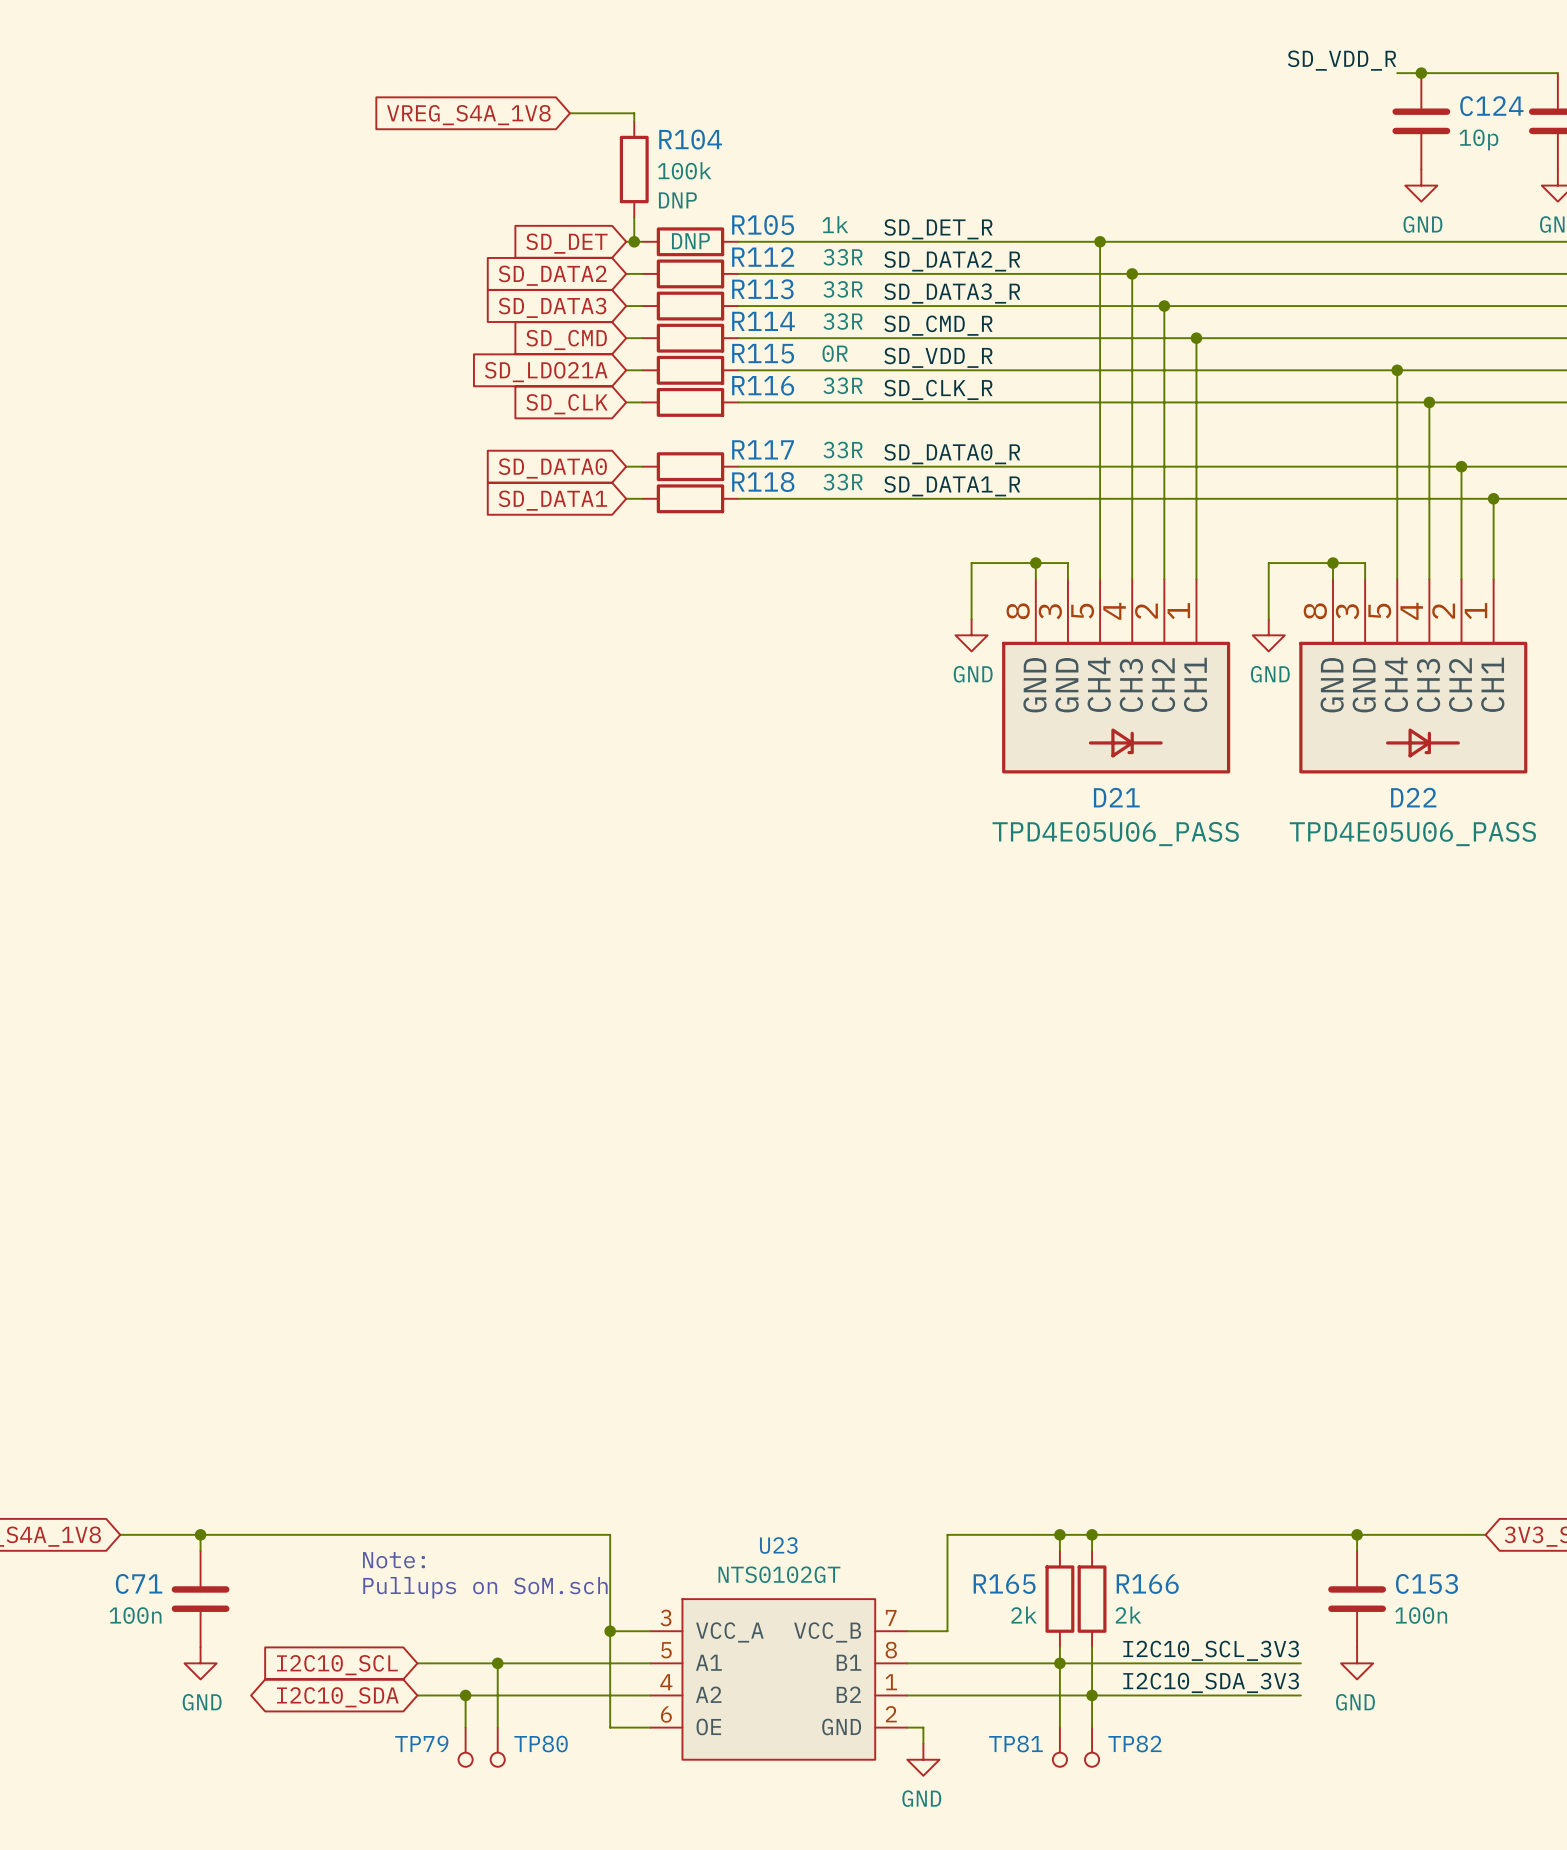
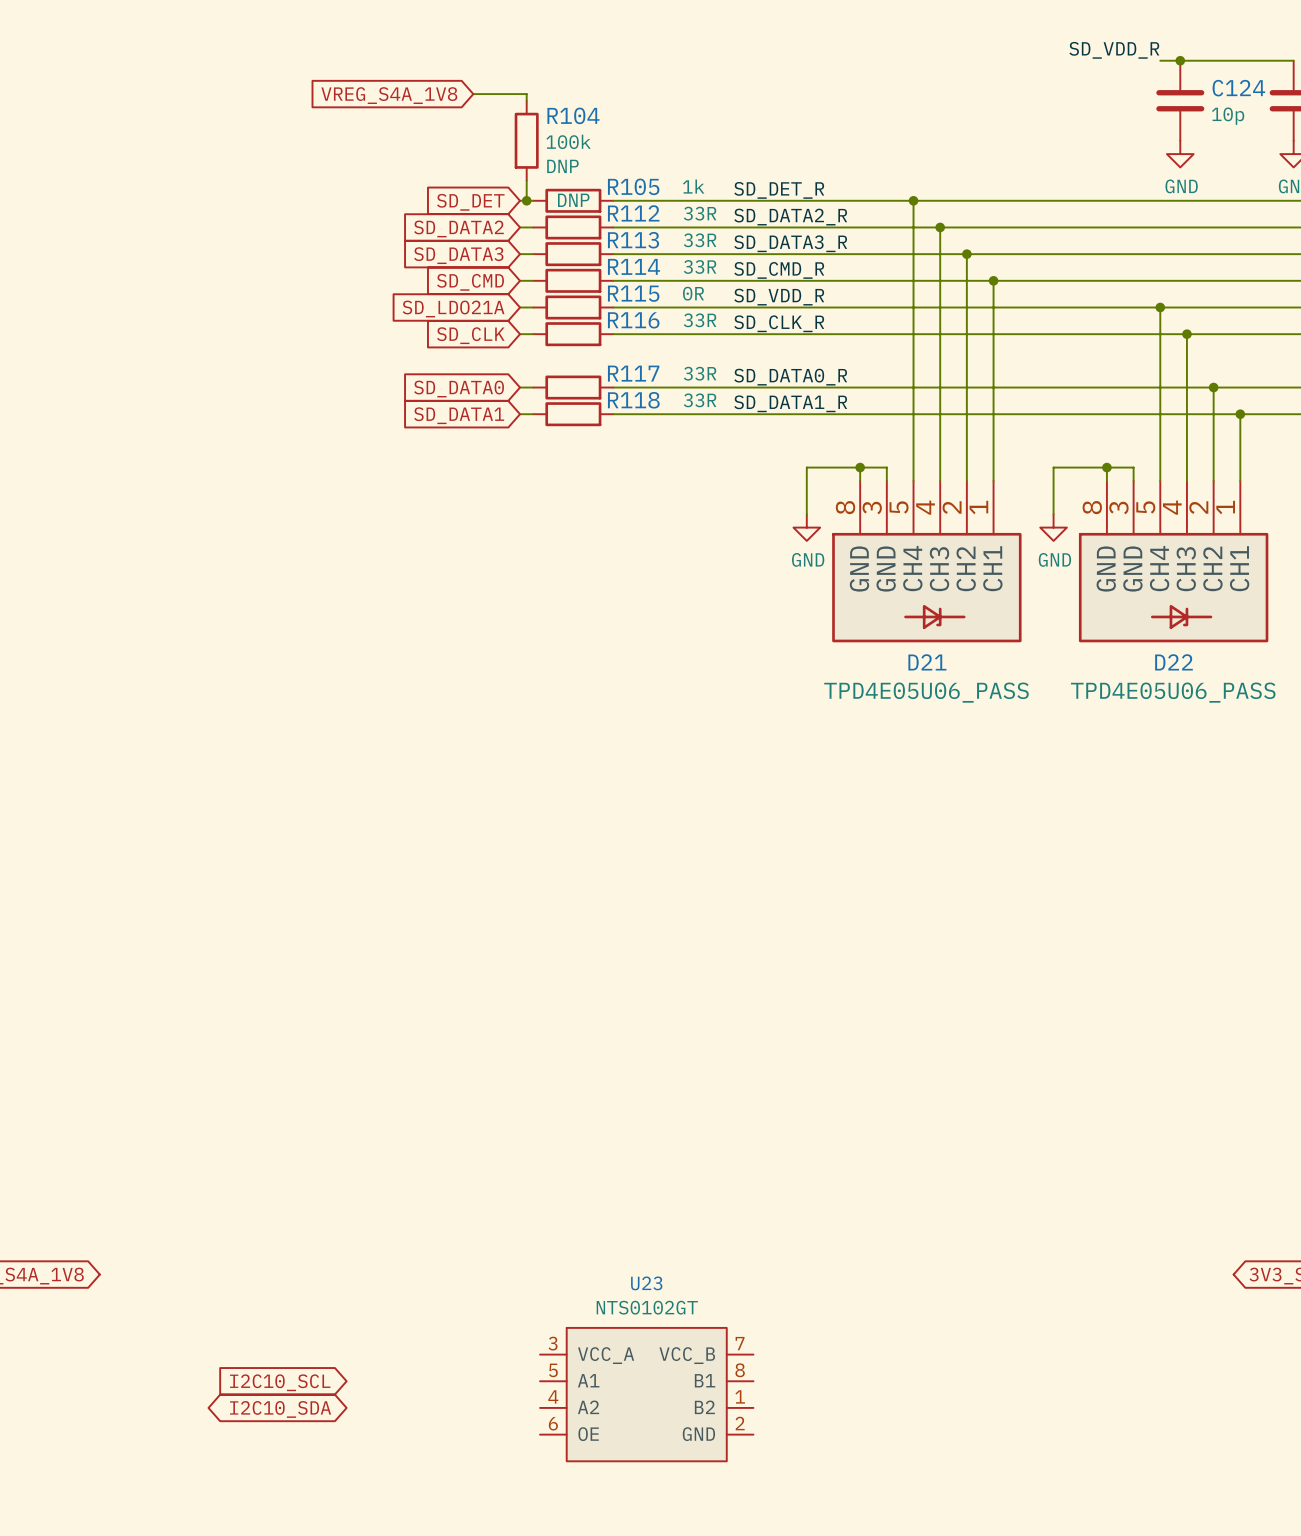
wire: (120, 1534) (610, 1534) (610, 1727) (650, 1727) -> none
wire: (200, 1534) (200, 1550) -> none
junction: (200, 1534) -> none
wire: (1059, 1534) (1059, 1550) -> none
junction: (1059, 1534) -> none
wire: (1092, 1534) (1092, 1550) -> none
junction: (1092, 1534) -> none
wire: (1357, 1534) (1357, 1550) -> none
junction: (1357, 1534) -> none
wire: (1485, 1534) (947, 1534) (947, 1631) (907, 1631) -> none
text: Note: (394, 1560) -> none
text: Pullups on SoM.sch (485, 1587) -> none
C71: (200, 1599) -> none
R165: (1059, 1599) -> none
R166: (1092, 1599) -> none
C153: (1357, 1599) -> none
wire: (610, 1631) (650, 1631) -> none
junction: (610, 1631) -> none
wire: (1059, 1647) (1059, 1727) -> none
wire: (1092, 1647) (1092, 1727) -> none
label: I2C10_SCL_3V3 (1211, 1650) -> none
power symbol: GND (200, 1663) -> none
wire: (417, 1663) (650, 1663) -> none
wire: (497, 1663) (497, 1727) -> none
junction: (497, 1663) -> none
wire: (907, 1663) (1300, 1663) -> none
junction: (1059, 1663) -> none
power symbol: GND (1357, 1663) -> none
label: I2C10_SDA_3V3 (1211, 1682) -> none
wire: (417, 1695) (650, 1695) -> none
wire: (465, 1695) (465, 1727) -> none
junction: (465, 1695) -> none
wire: (907, 1695) (1300, 1695) -> none
junction: (1092, 1695) -> none
wire: (907, 1727) (923, 1727) (923, 1743) -> none
TP79: (465, 1747) -> none
TP80: (497, 1747) -> none
TP81: (1059, 1747) -> none
TP82: (1092, 1747) -> none
power symbol: GND (923, 1759) -> none

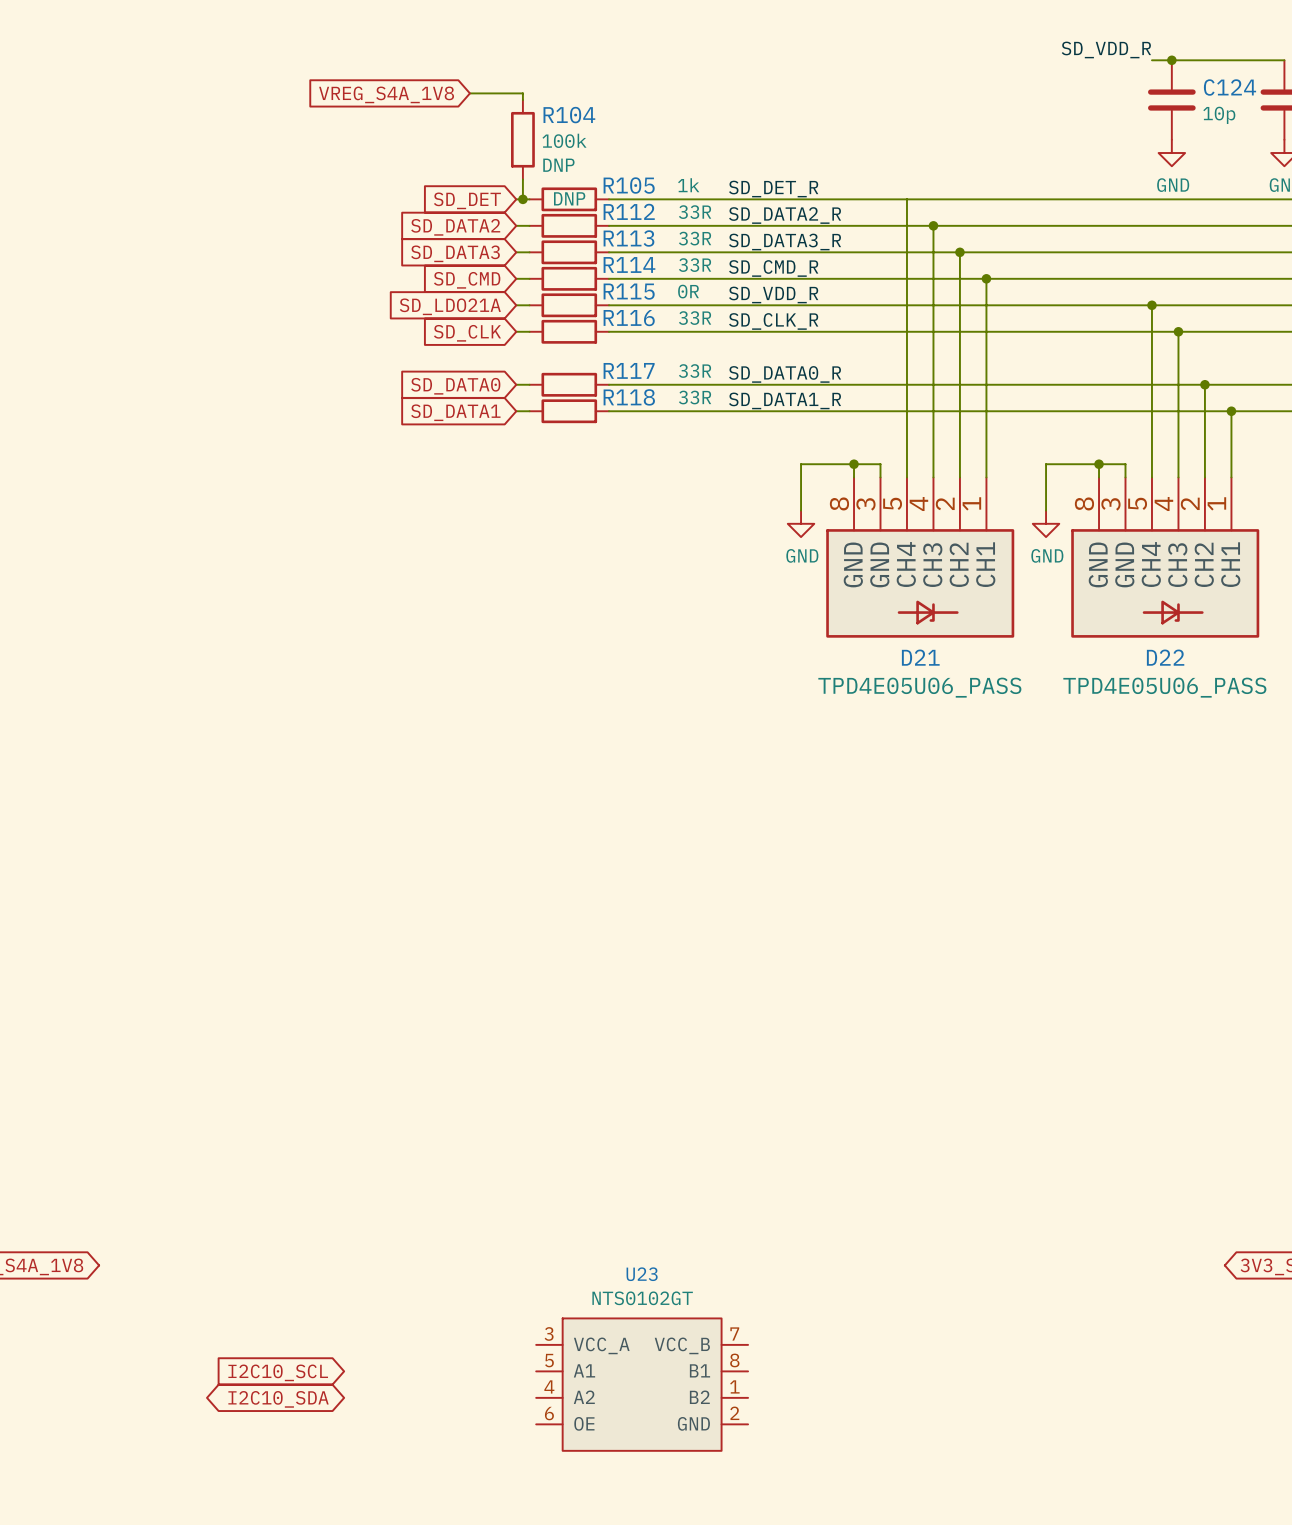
junction: (913, 200) -> none

